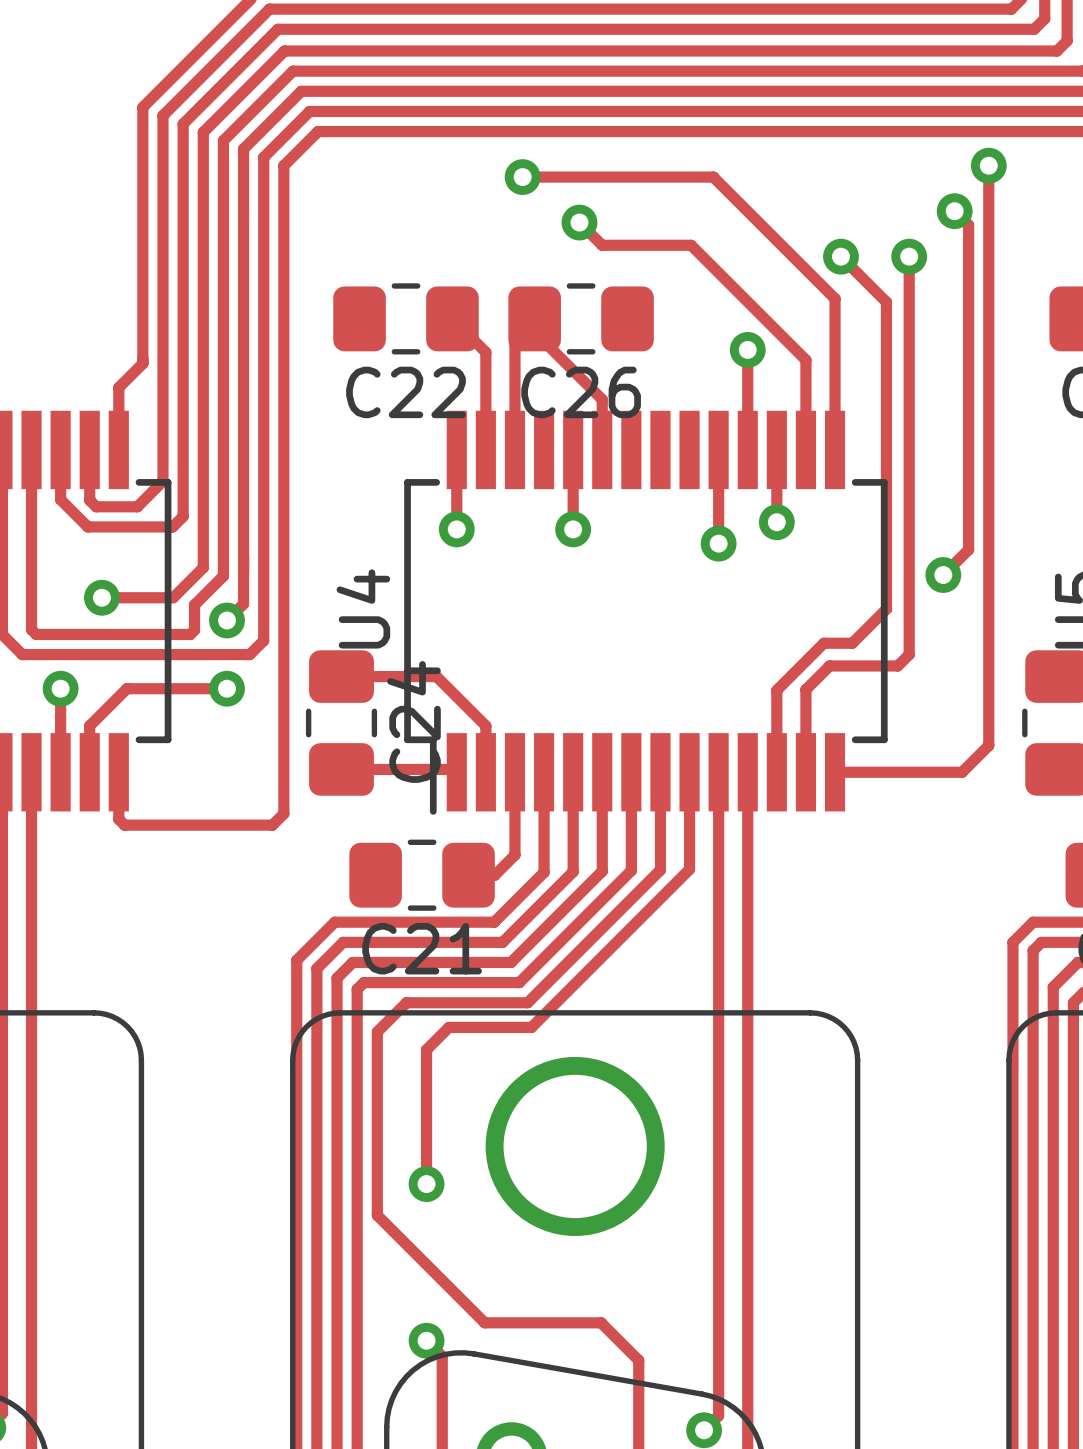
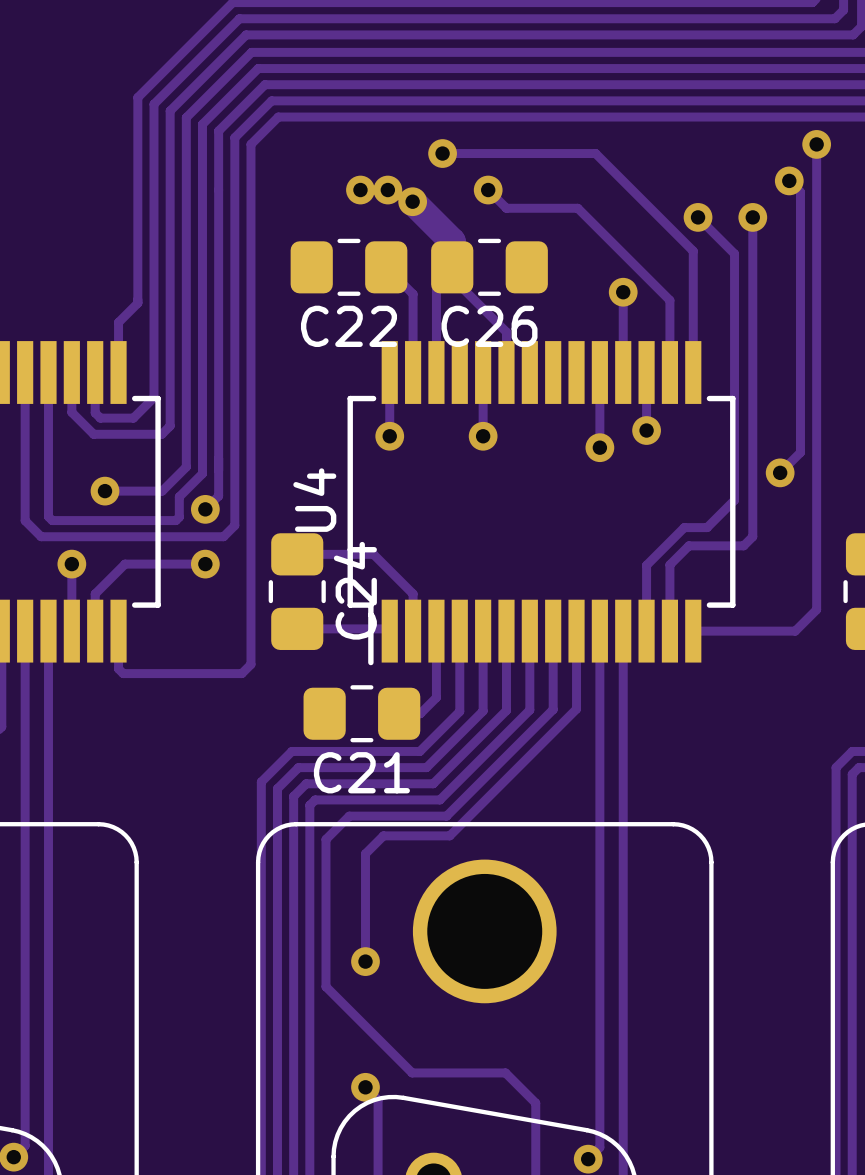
via: none -> (360, 190)
via: none -> (387, 190)
track: none -> (412, 201) (452, 241) (452, 267)
via: none -> (412, 201)

